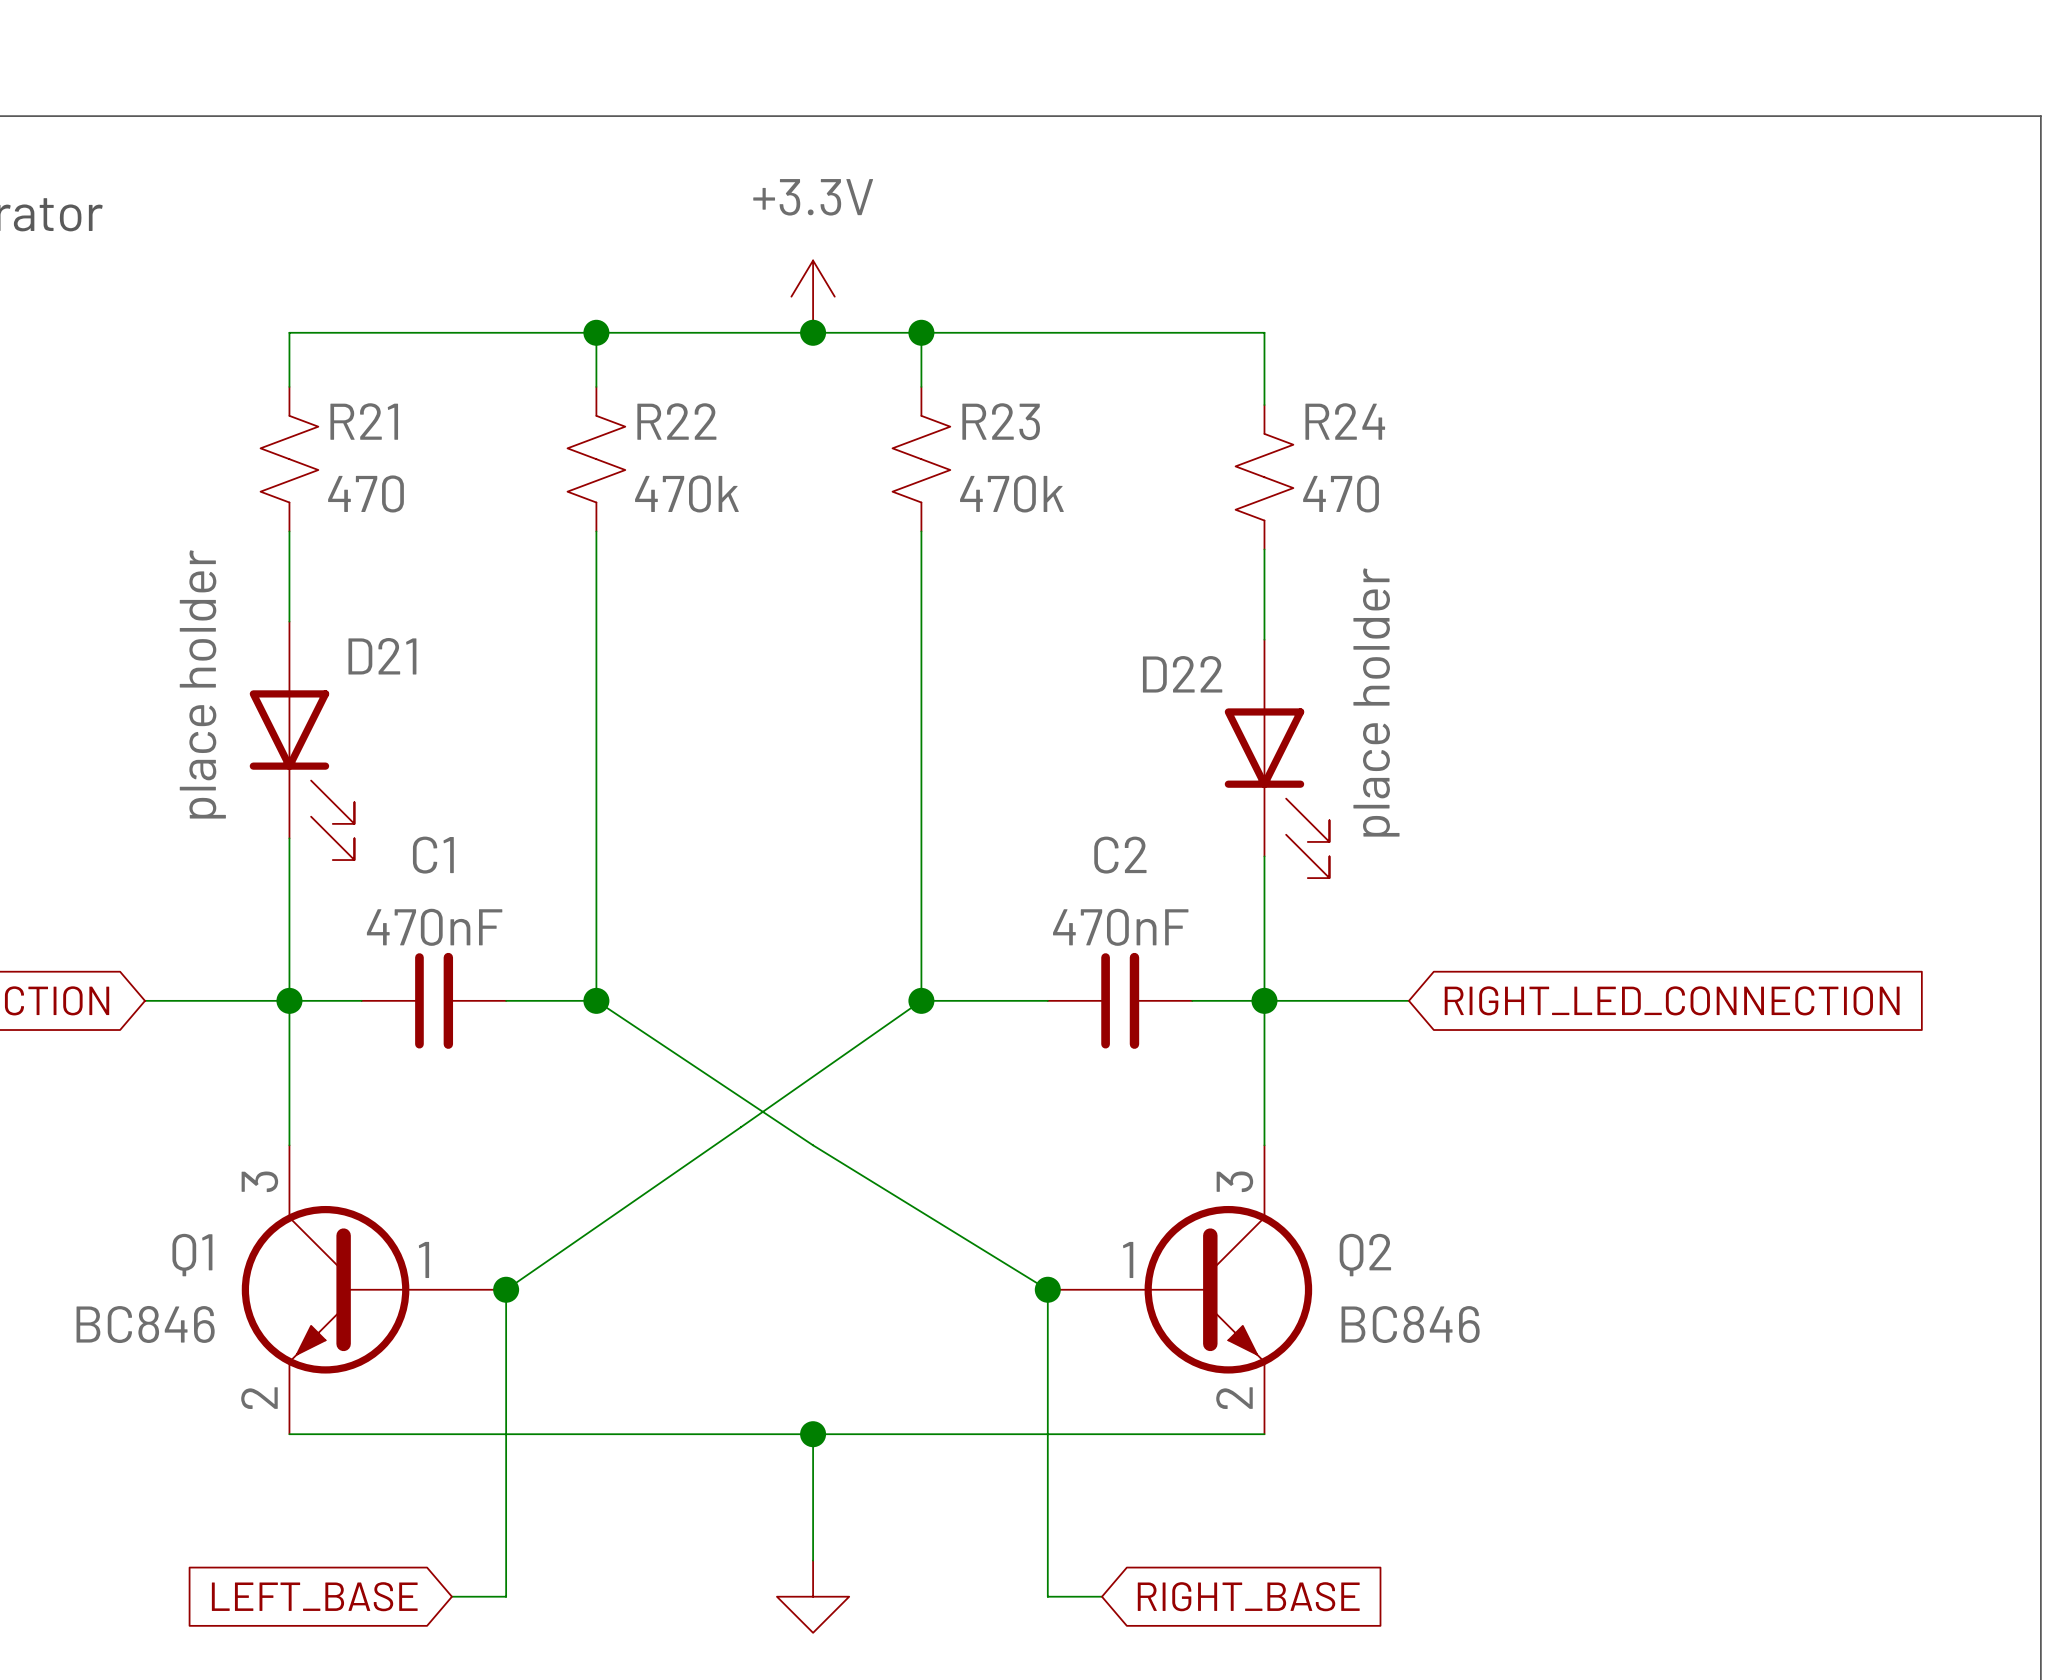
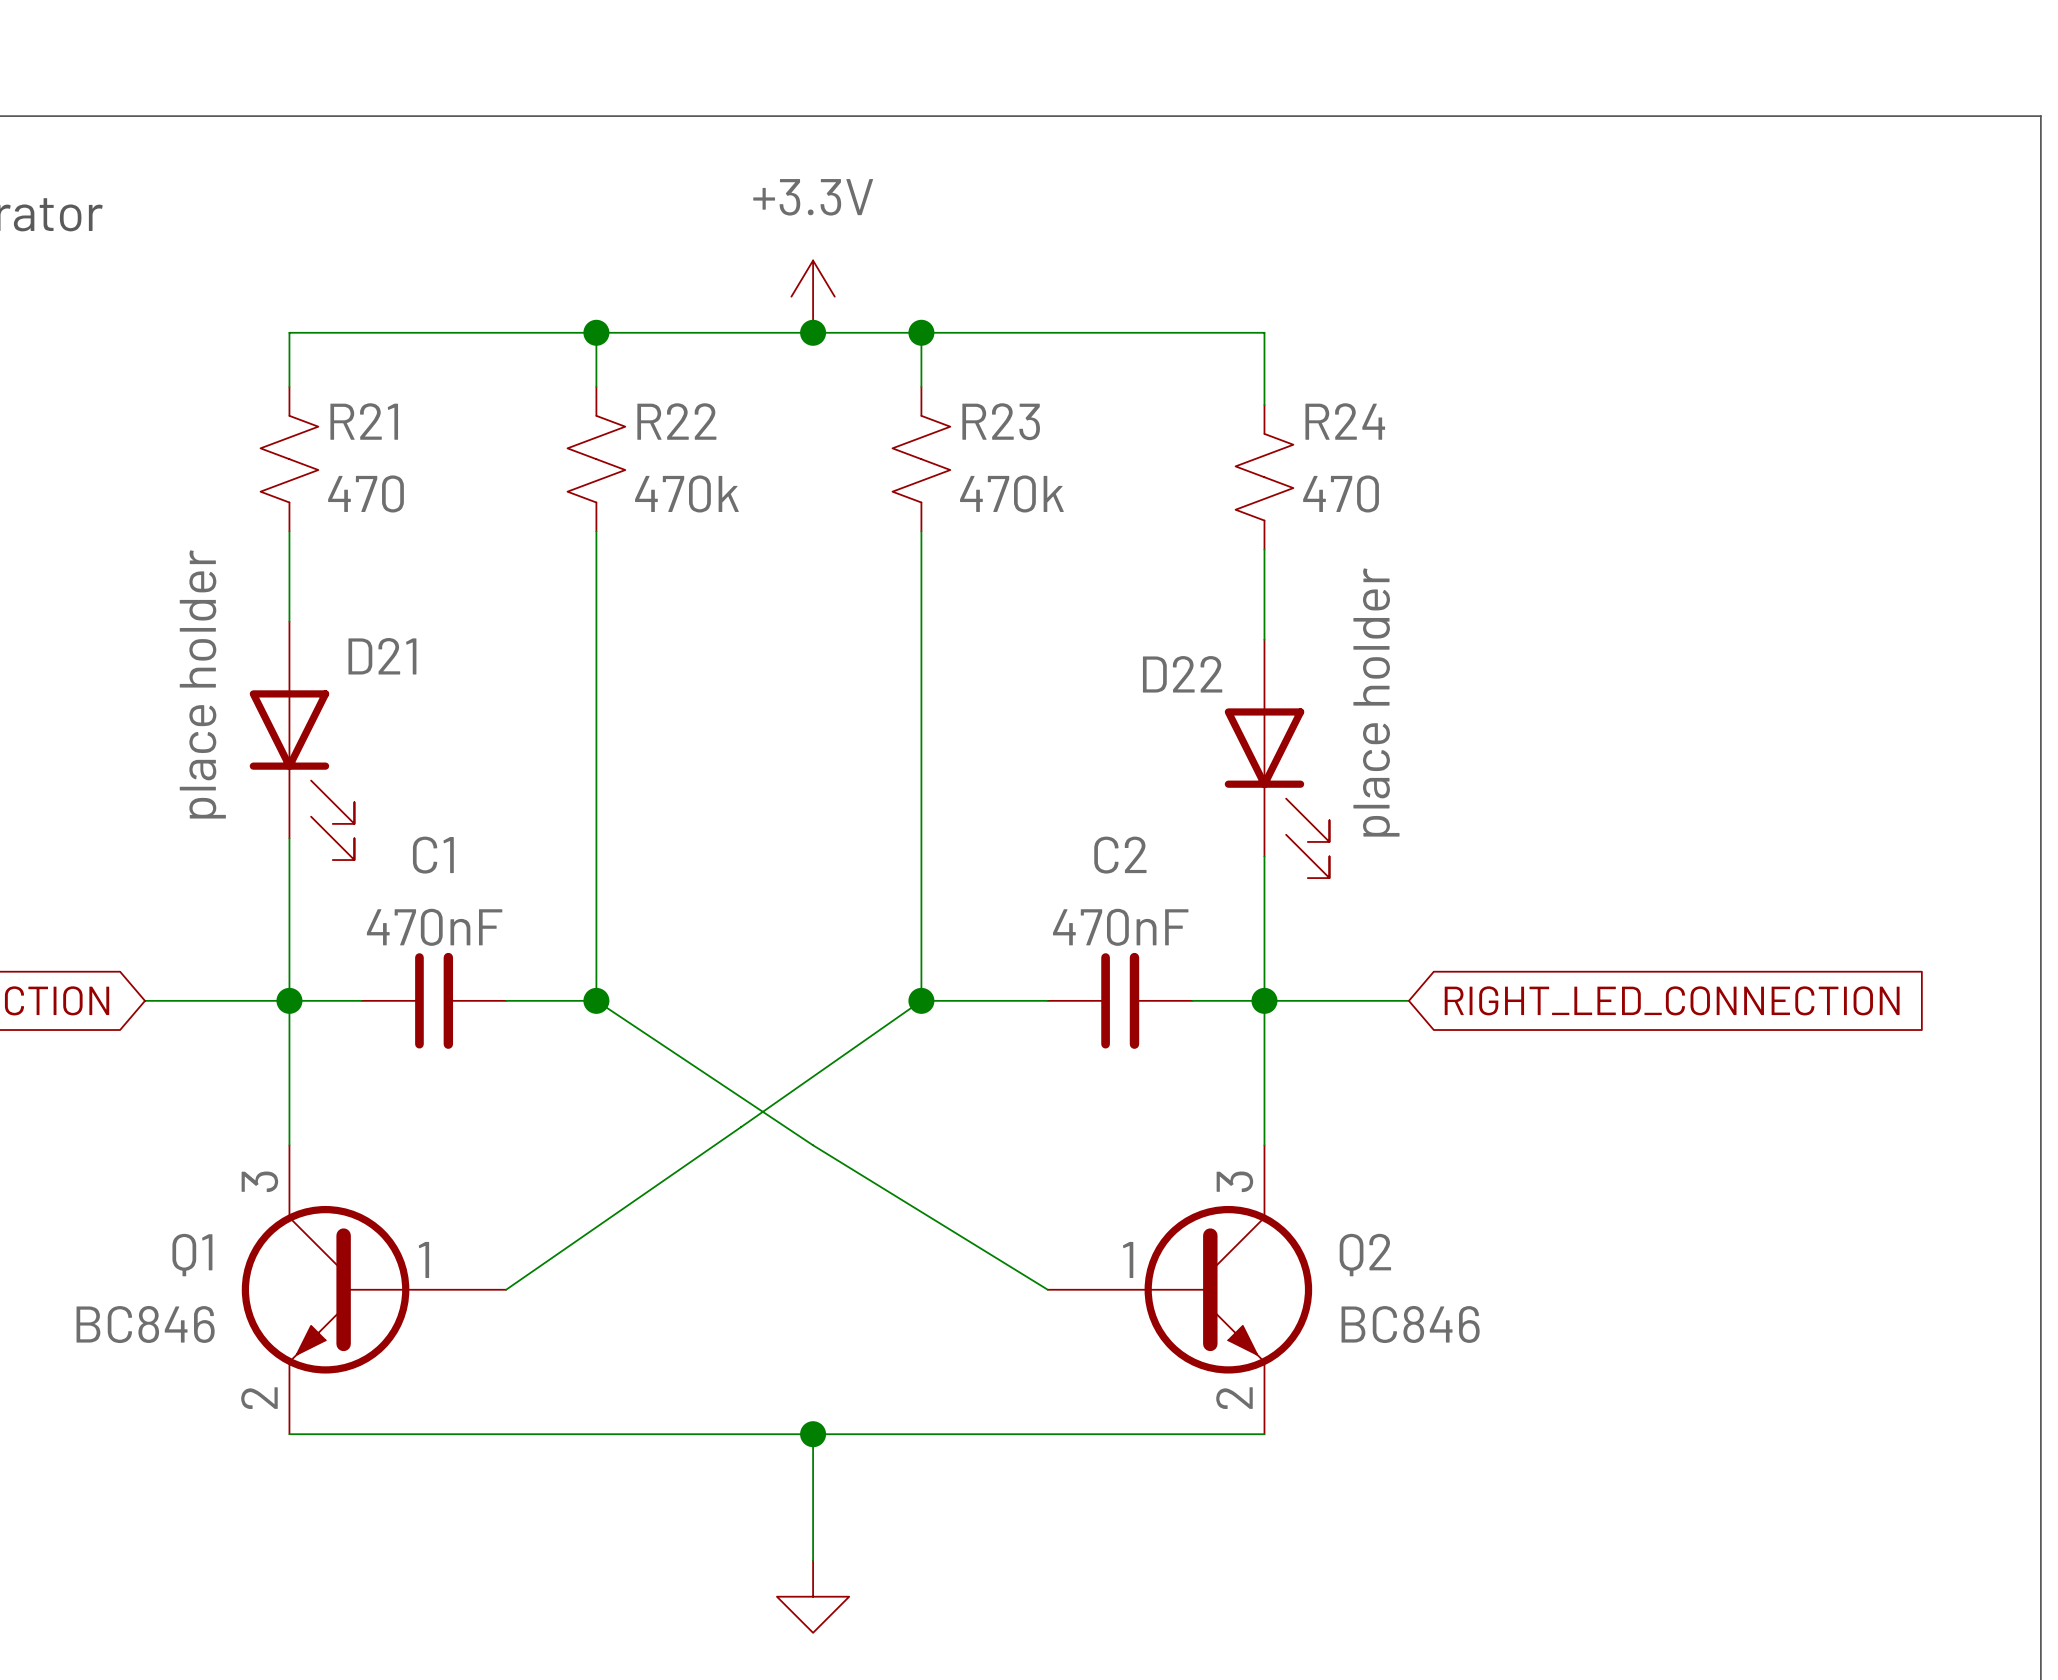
wire: (506, 1289) (506, 1596) (451, 1596) -> none
junction: (506, 1289) -> none
wire: (1047, 1289) (1047, 1596) (1101, 1596) -> none
junction: (1047, 1289) -> none
global label: LEFT_BASE (314, 1596) -> none
global label: RIGHT_BASE (1248, 1596) -> none

